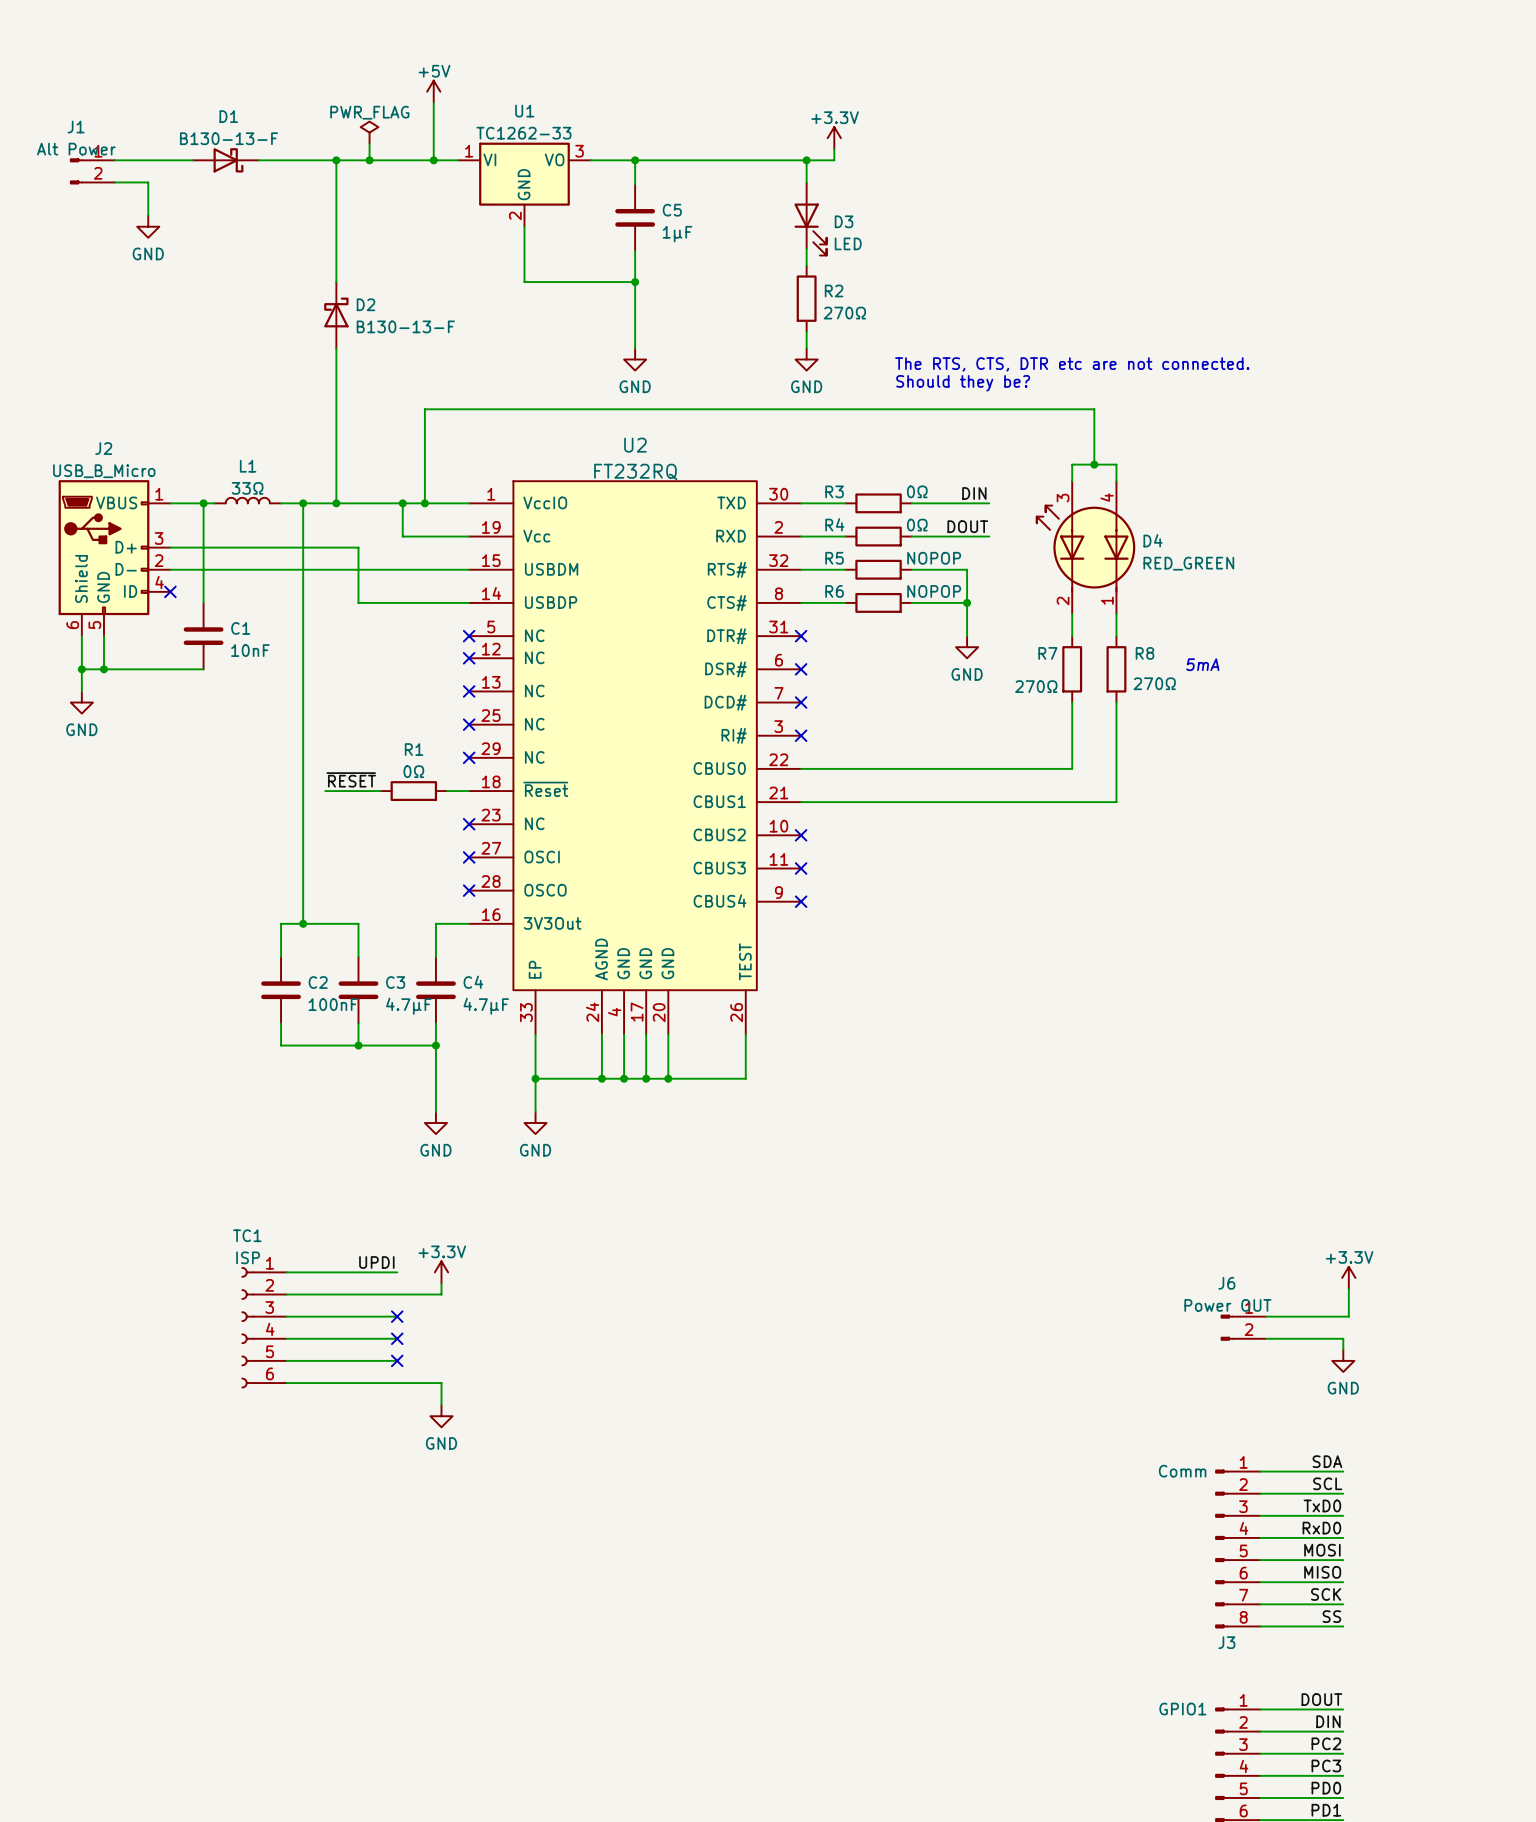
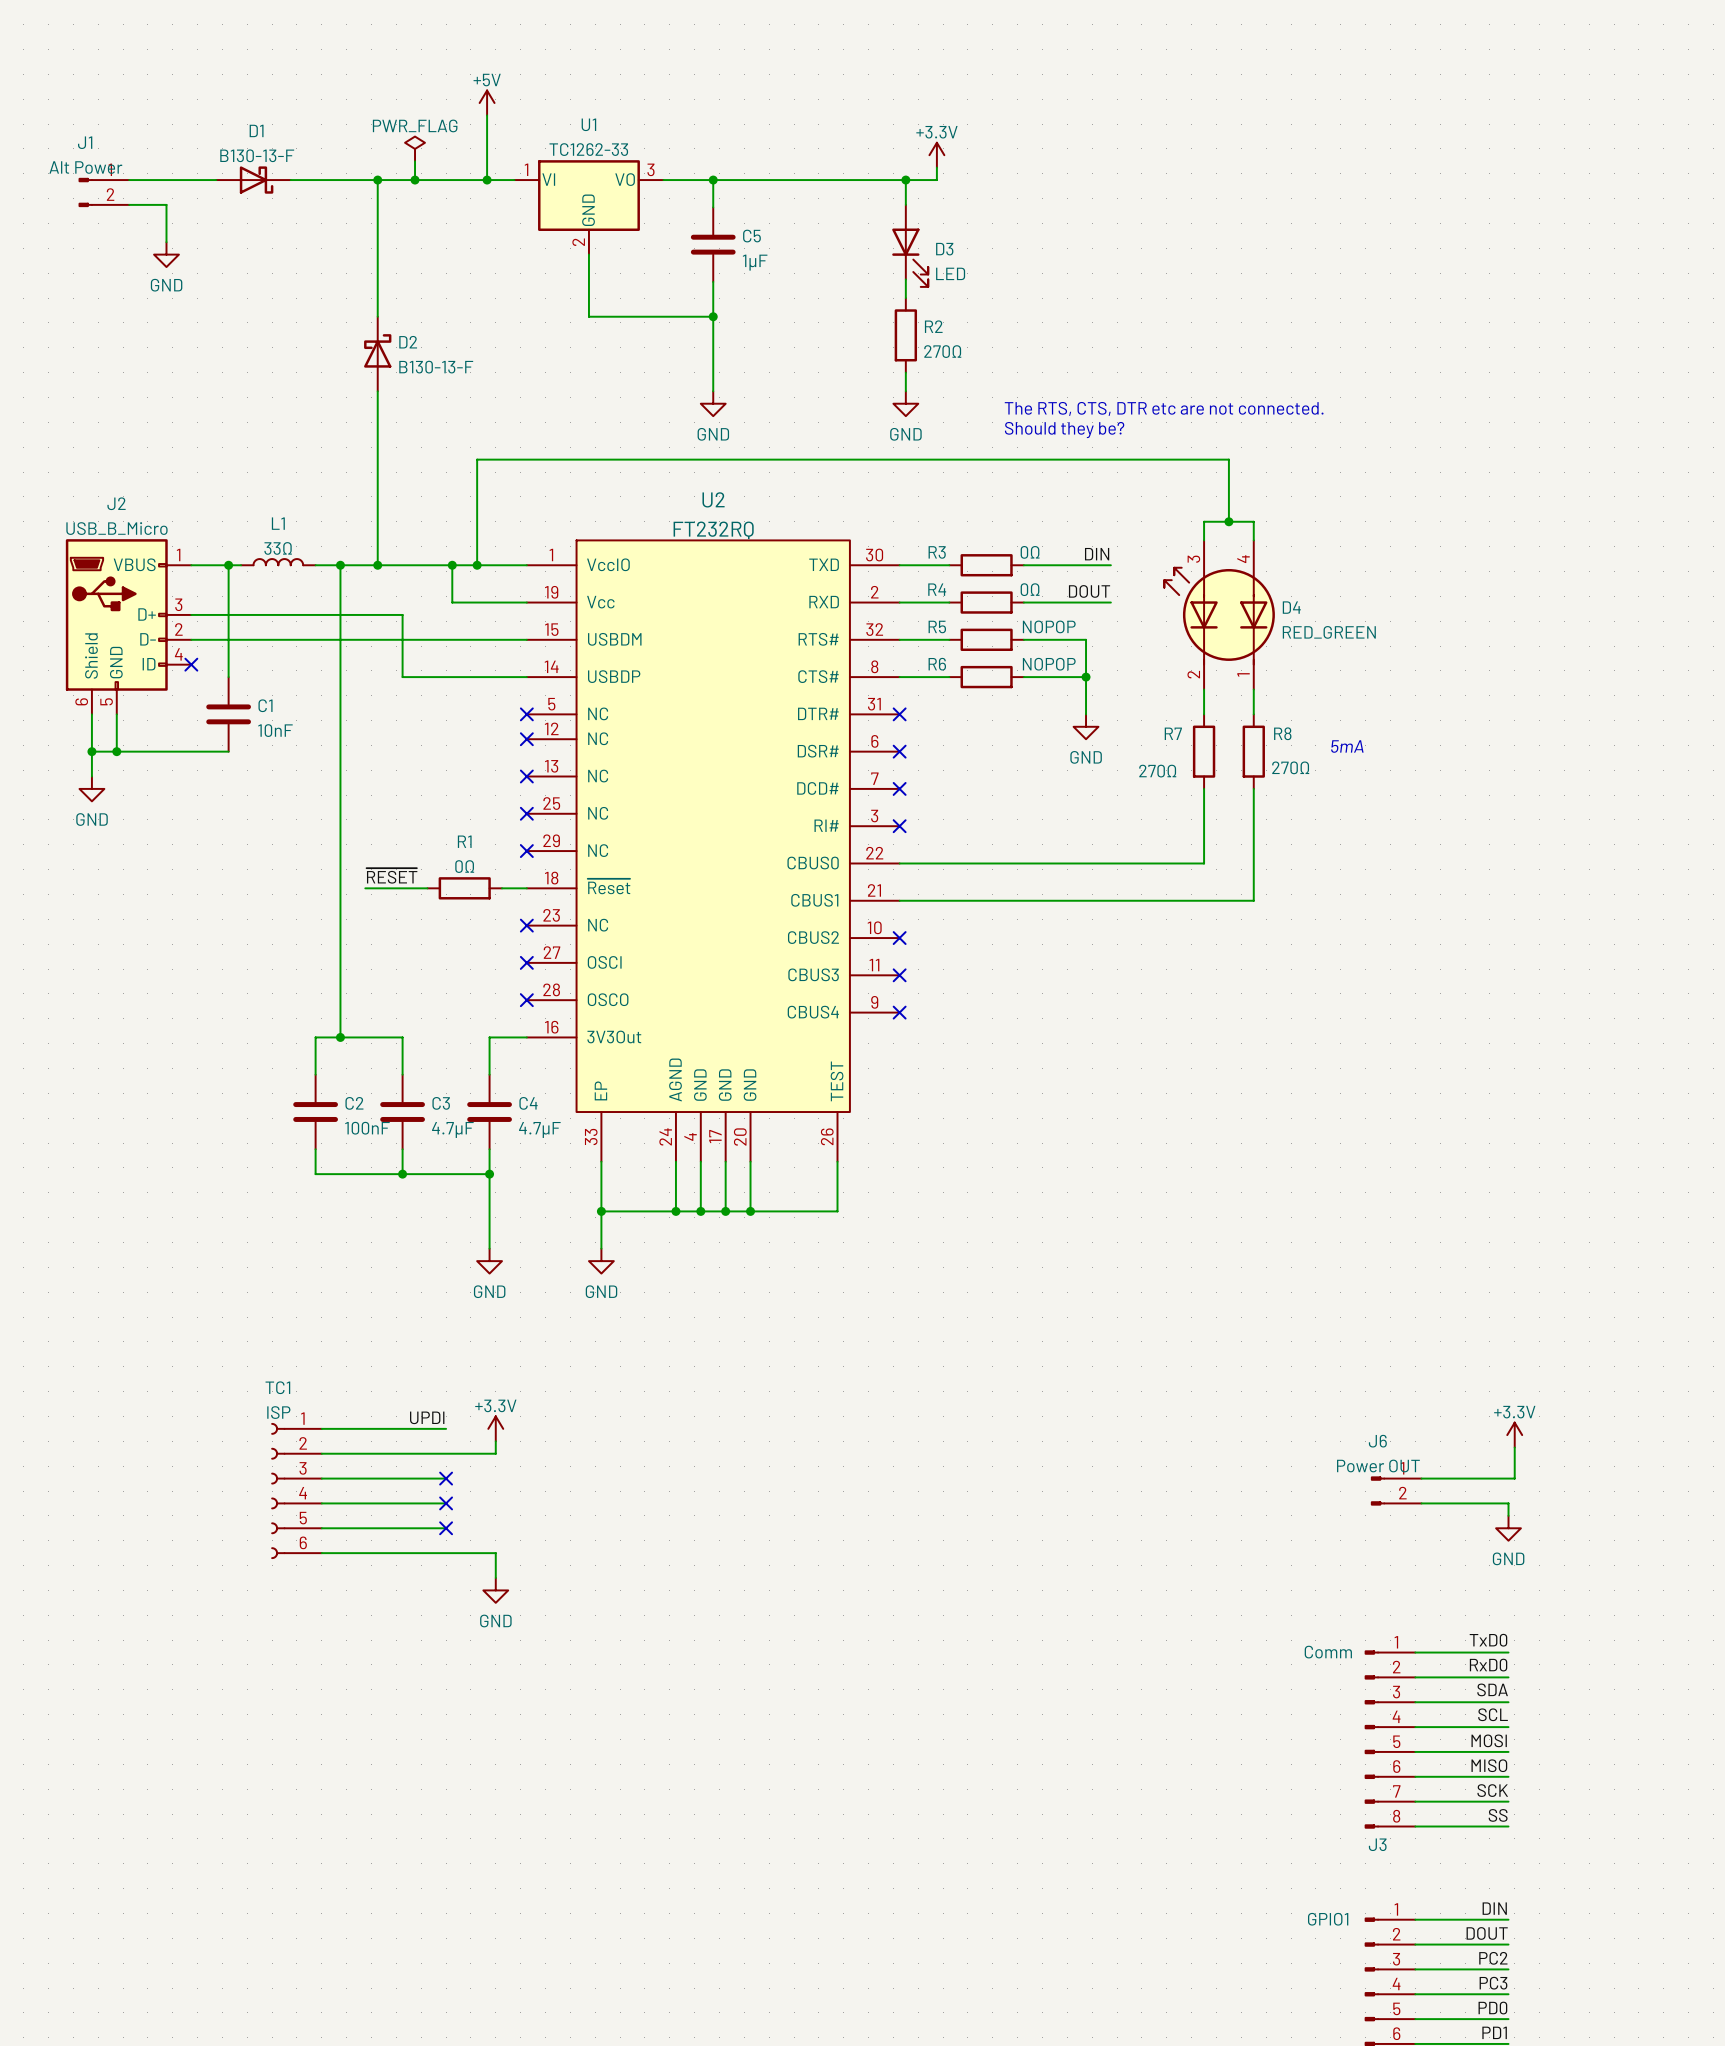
label: SDA (1327, 1461) -> TxD0 (1488, 1640)
label: SCL (1327, 1483) -> RxD0 (1488, 1665)
label: TxD0 (1322, 1505) -> SDA (1492, 1689)
label: RxD0 (1321, 1528) -> SCL (1493, 1714)
label: DOUT (1321, 1699) -> DIN (1494, 1908)
label: DIN (1328, 1721) -> DOUT (1487, 1933)

